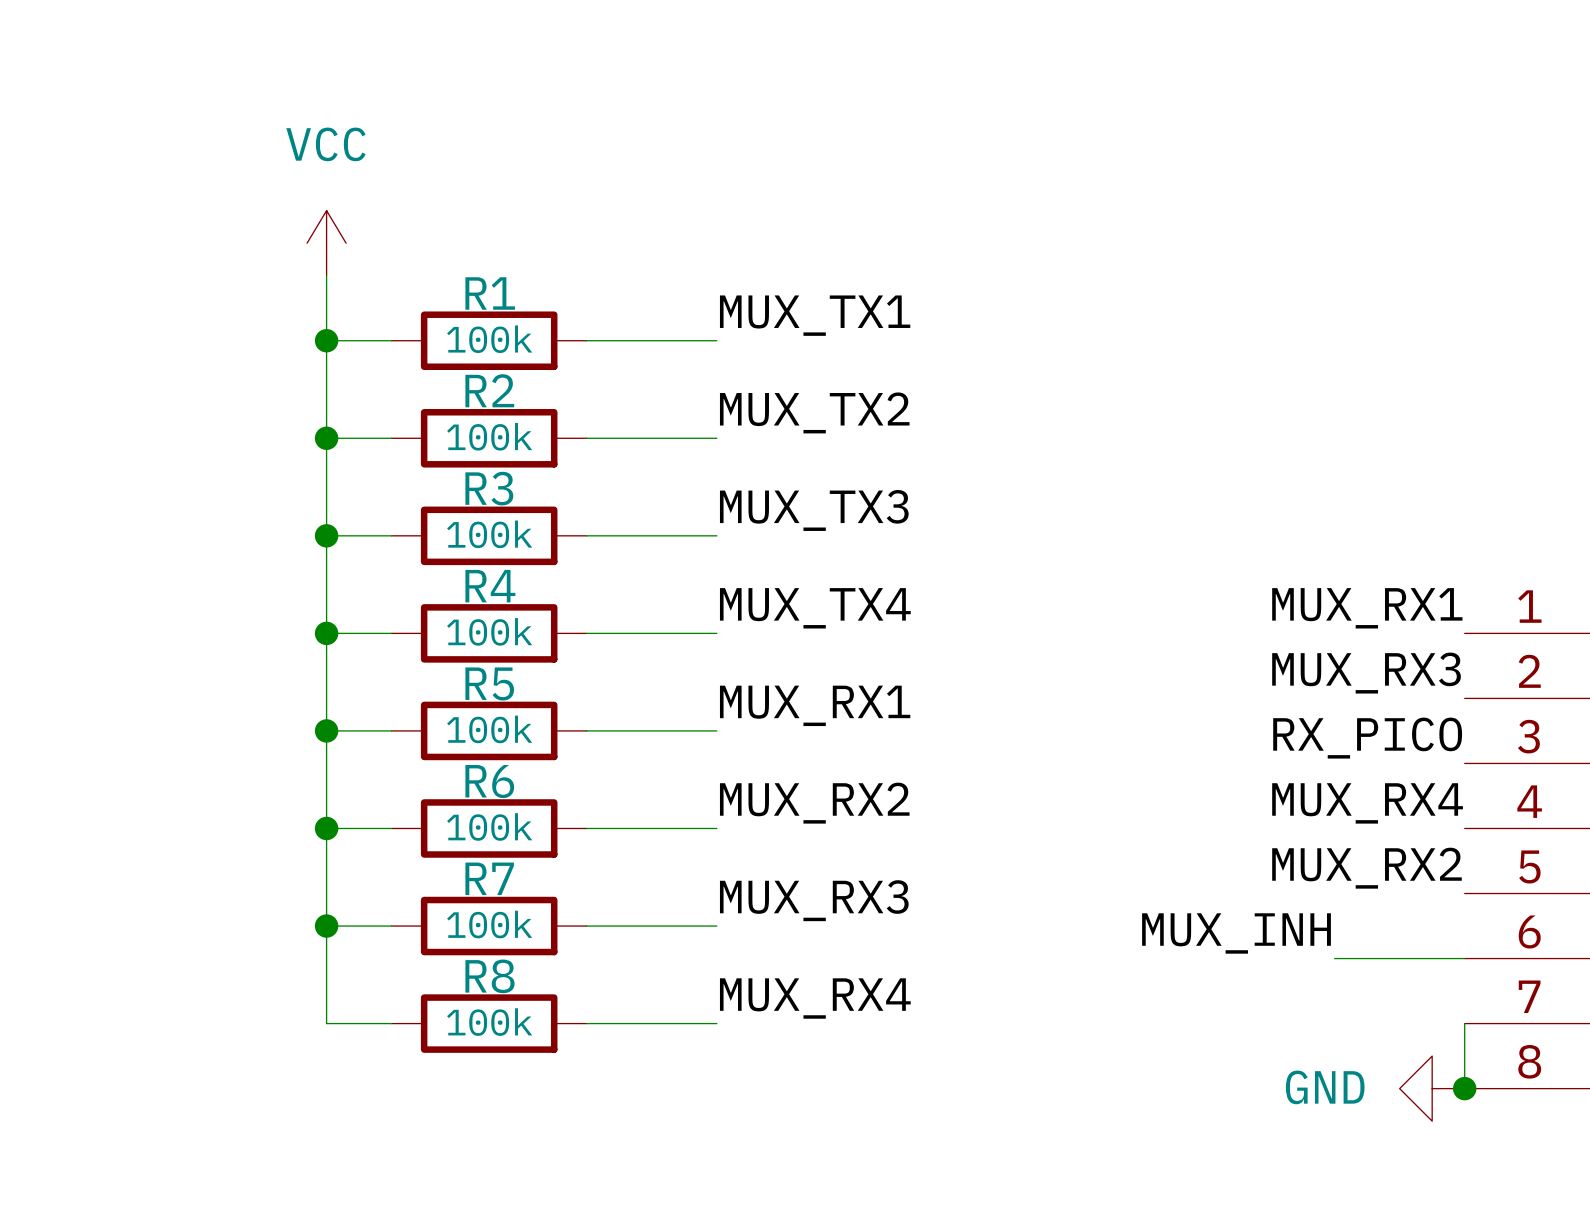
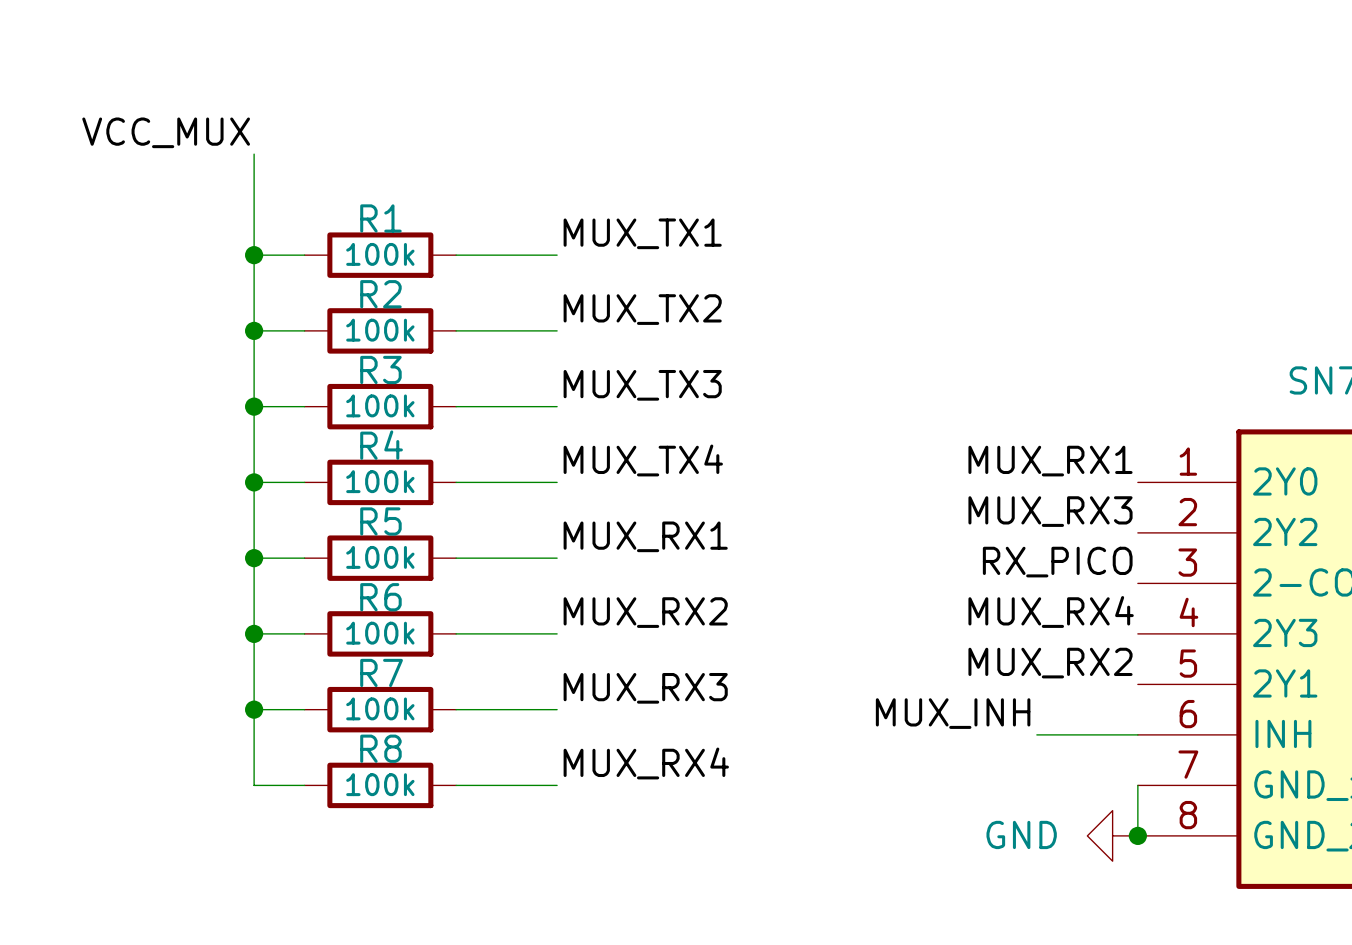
label: none -> VCC_MUX (166, 132)
power symbol: VCC (326, 243) -> none

